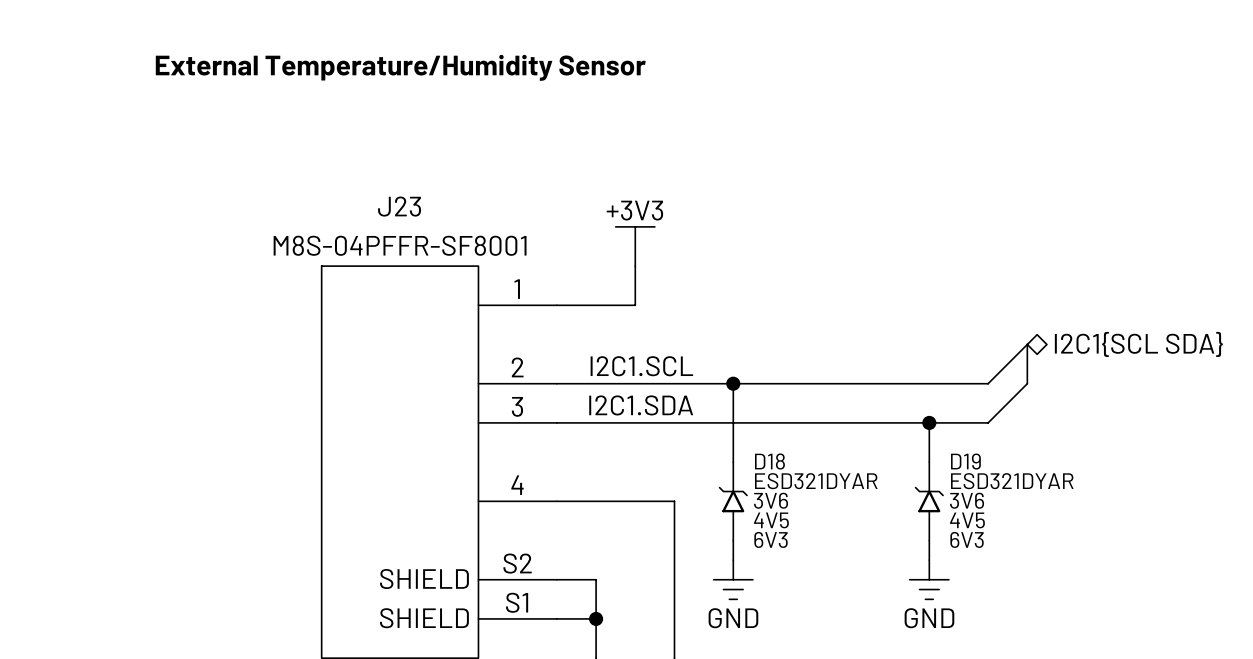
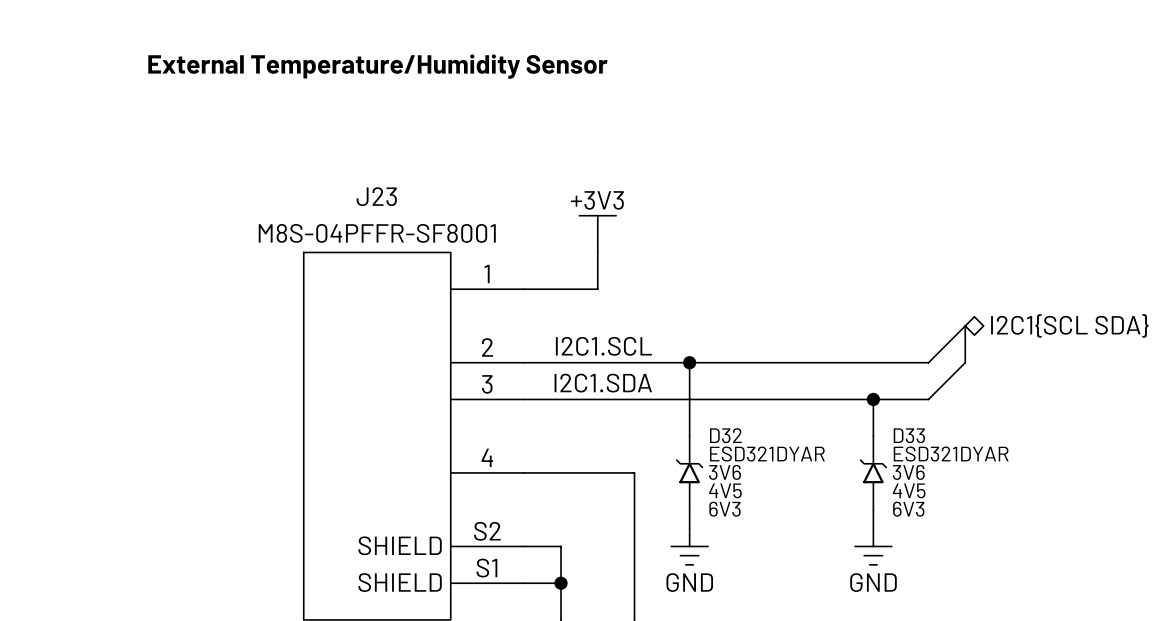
D18 name: D18 (769, 461) -> D32 (725, 435)
D19 name: D19 (965, 461) -> D33 (909, 435)

